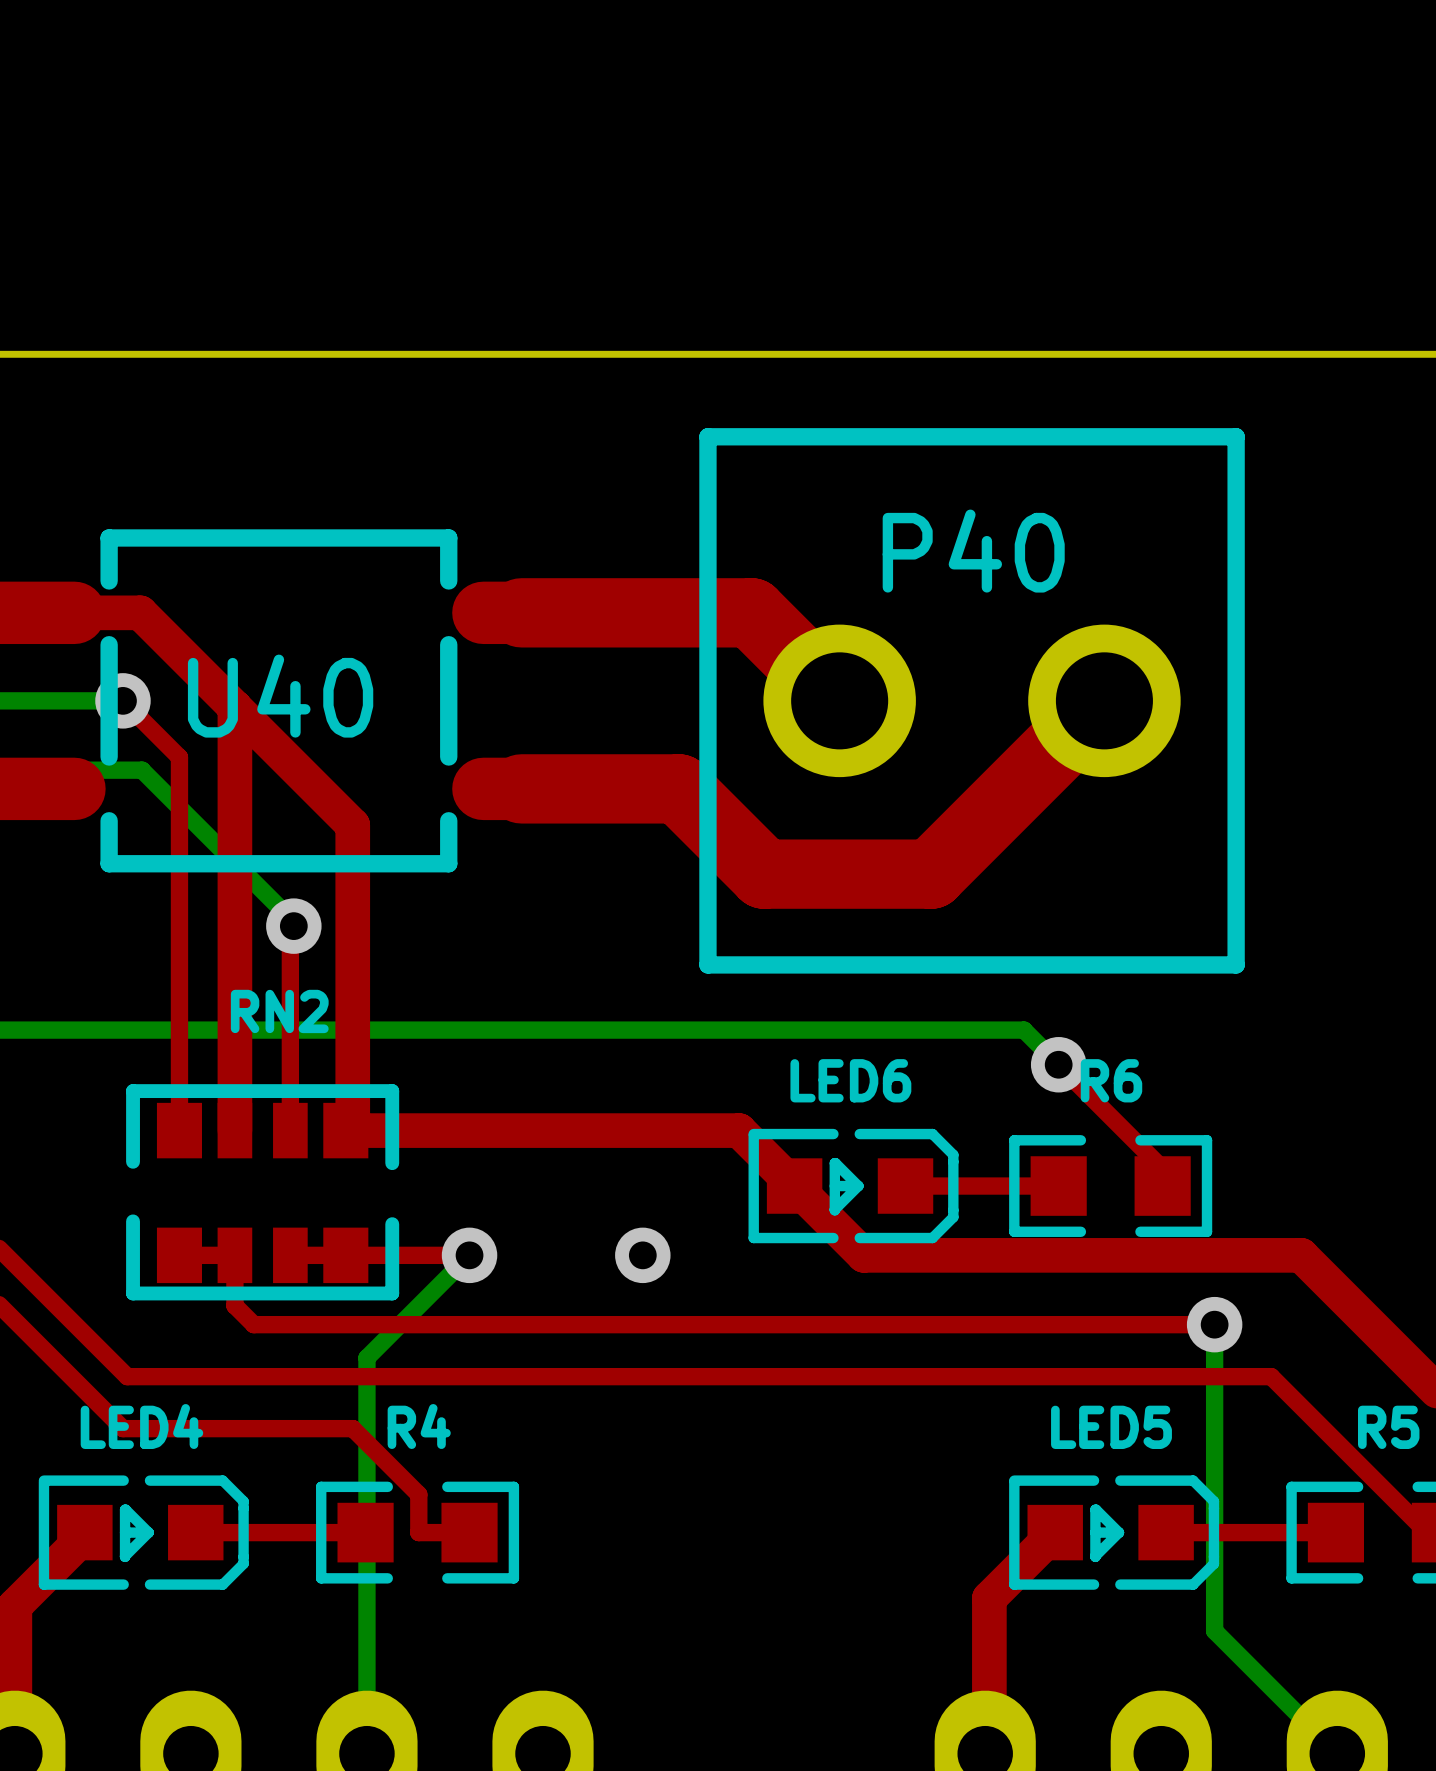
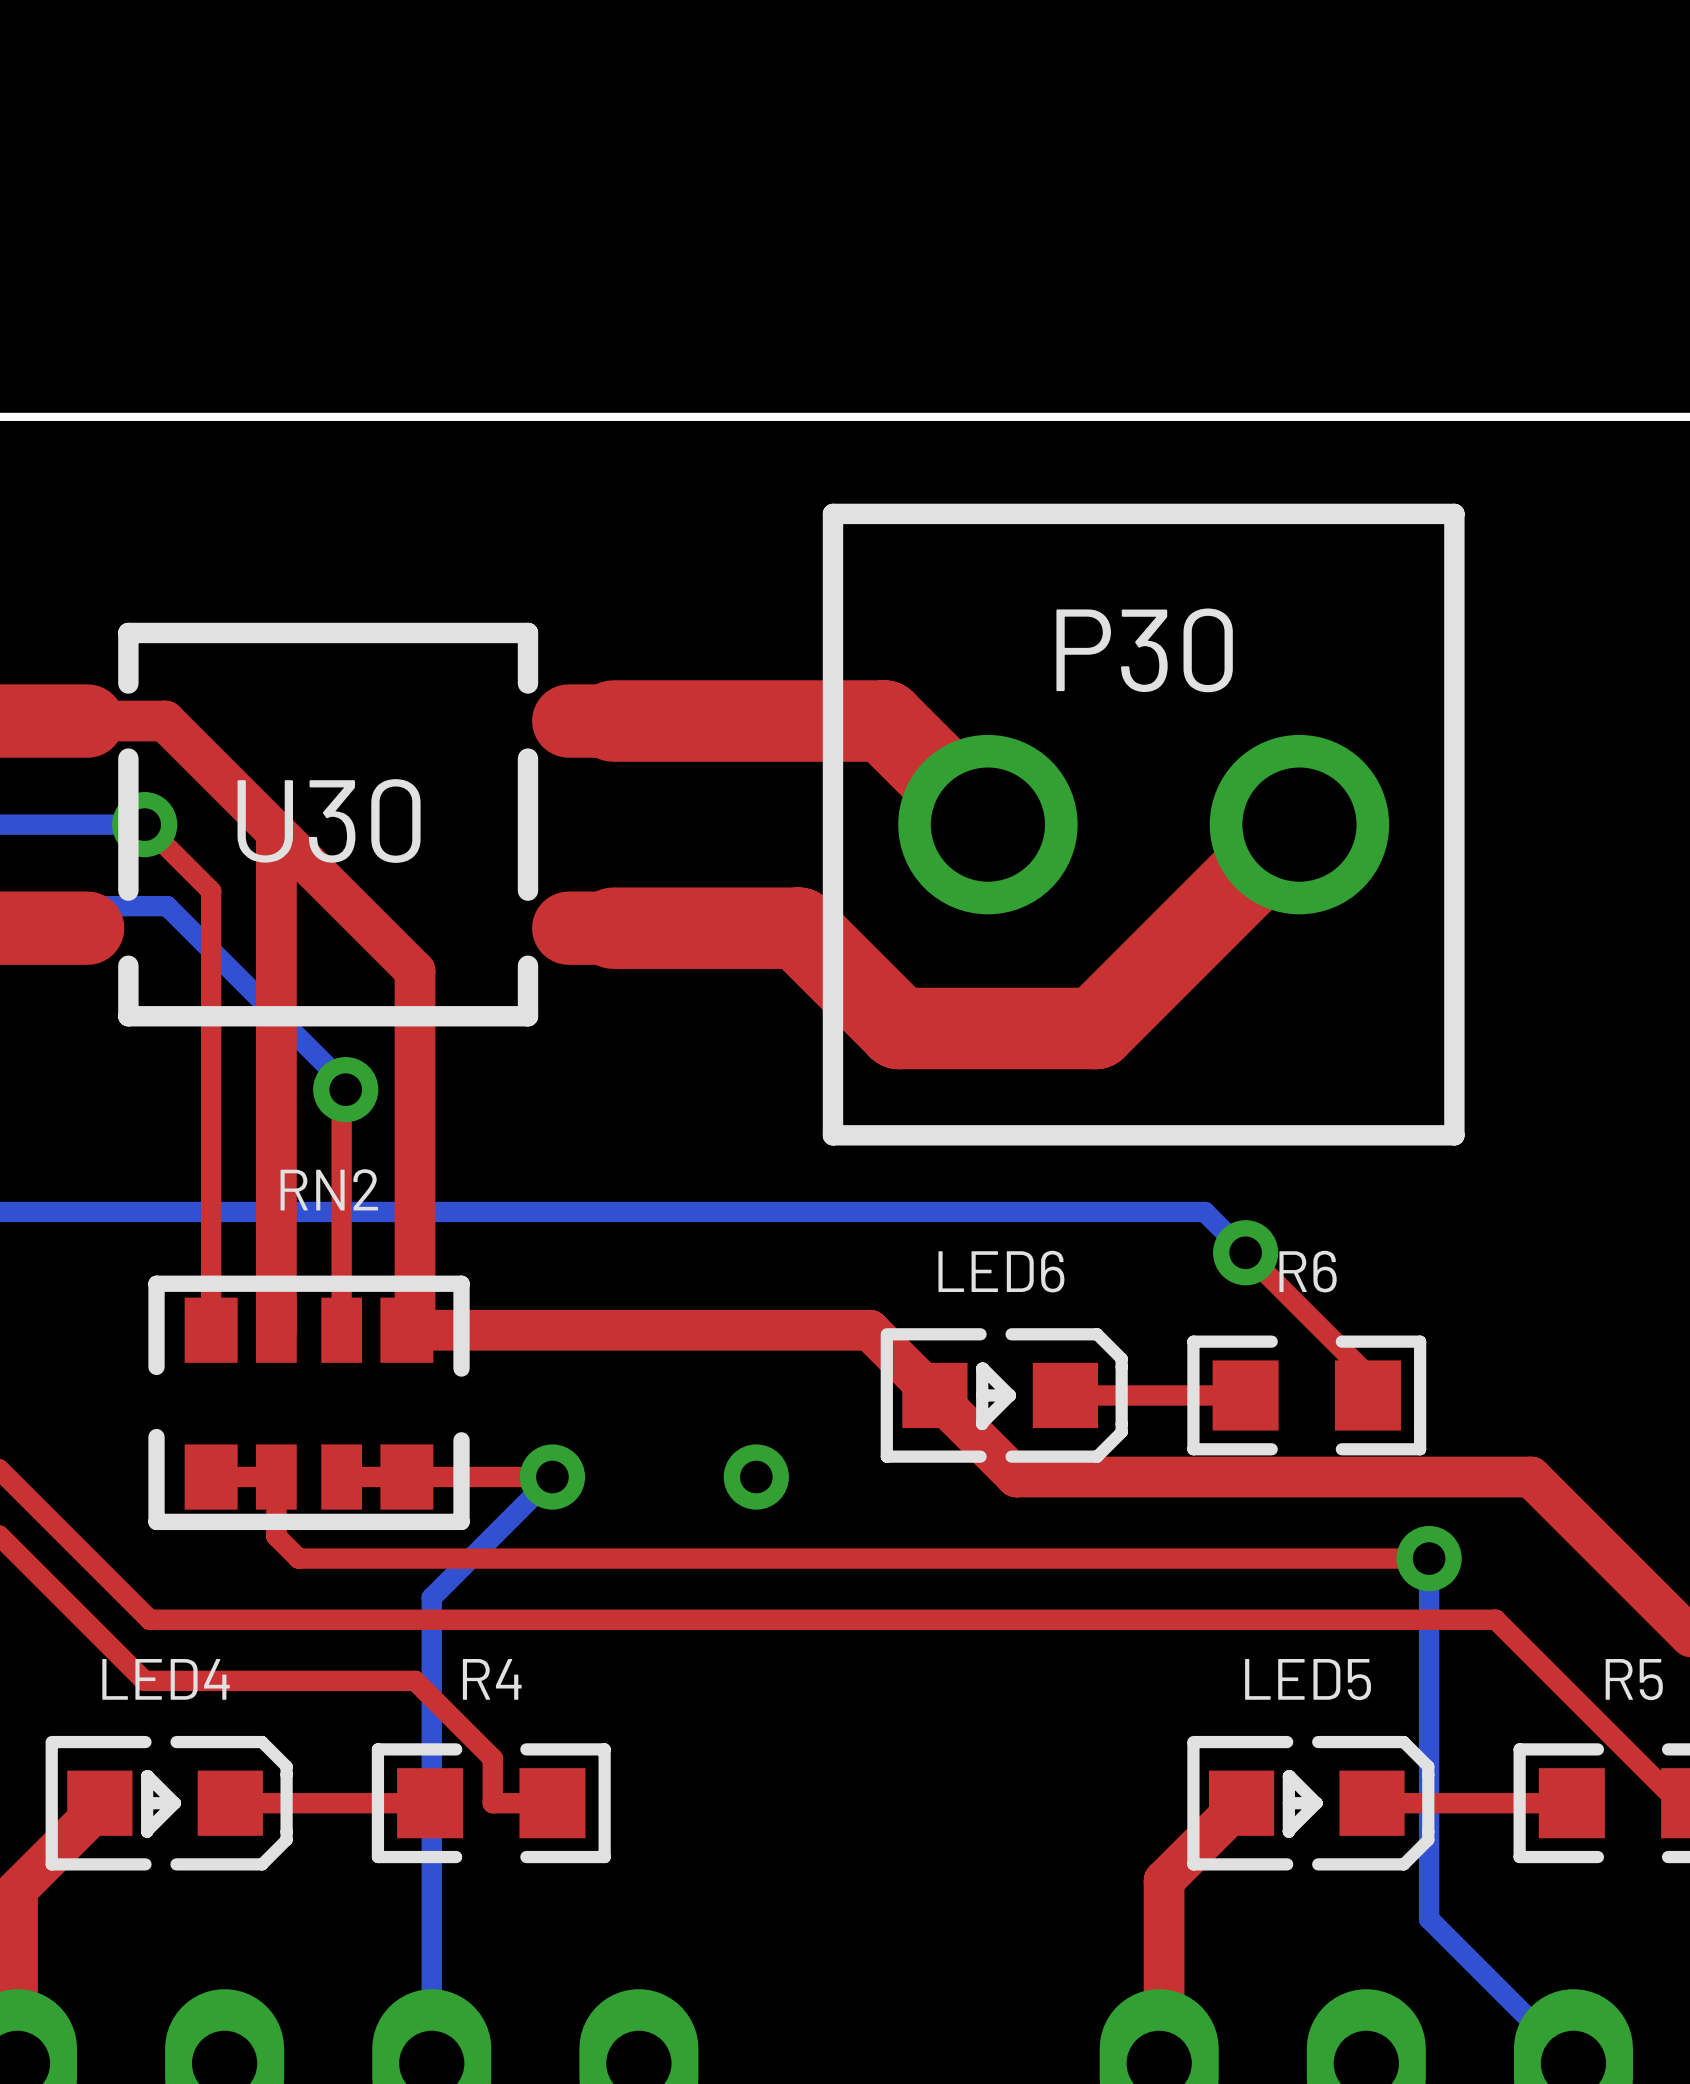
P40 name: P40 (973, 551) -> P30 (1144, 650)
U40 name: U40 (280, 696) -> U30 (329, 821)

